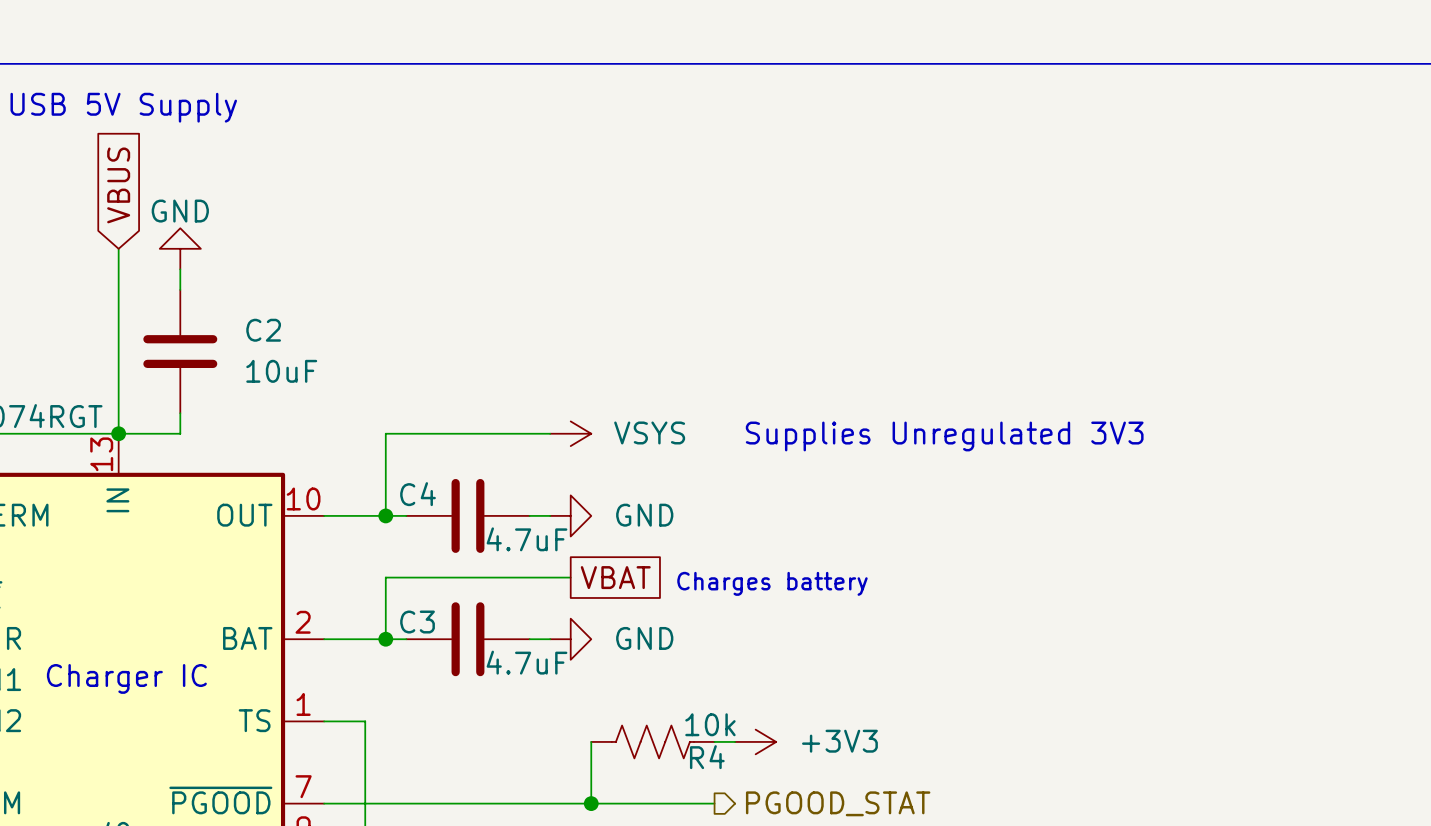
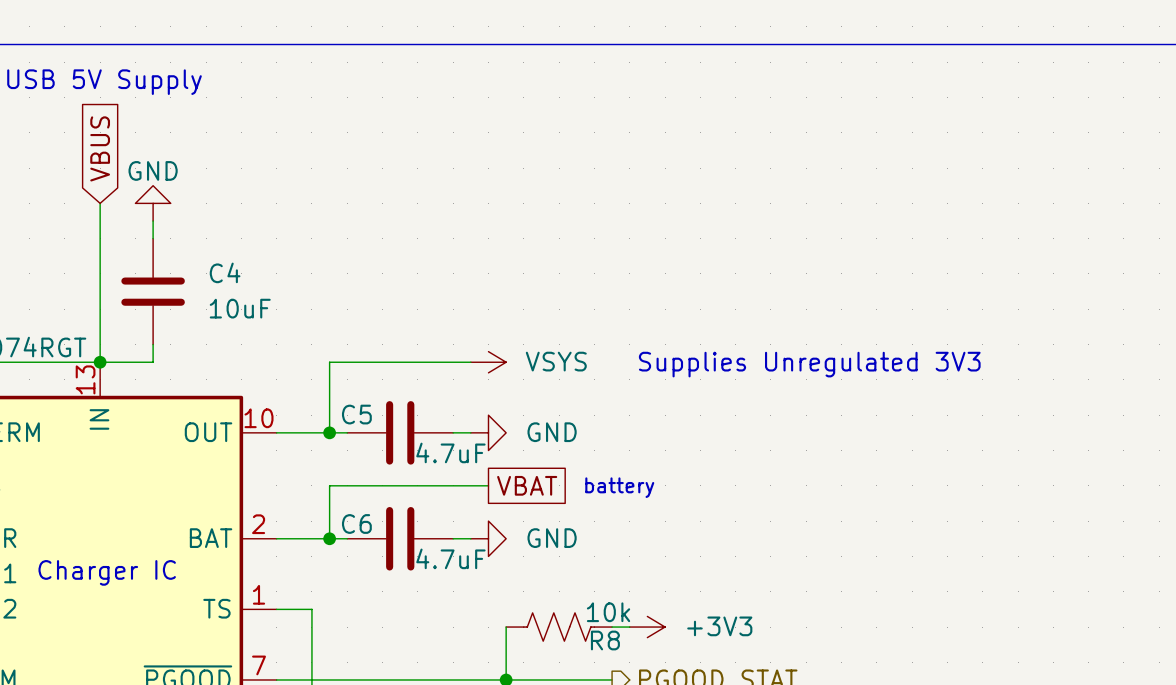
C2 name: C2 (263, 330) -> C4 (225, 272)
C4 name: C4 (418, 494) -> C5 (356, 414)
text: Charges battery (772, 583) -> battery (619, 487)
C3 name: C3 (417, 622) -> C6 (356, 523)
R4 name: R4 (707, 757) -> R8 (605, 640)

